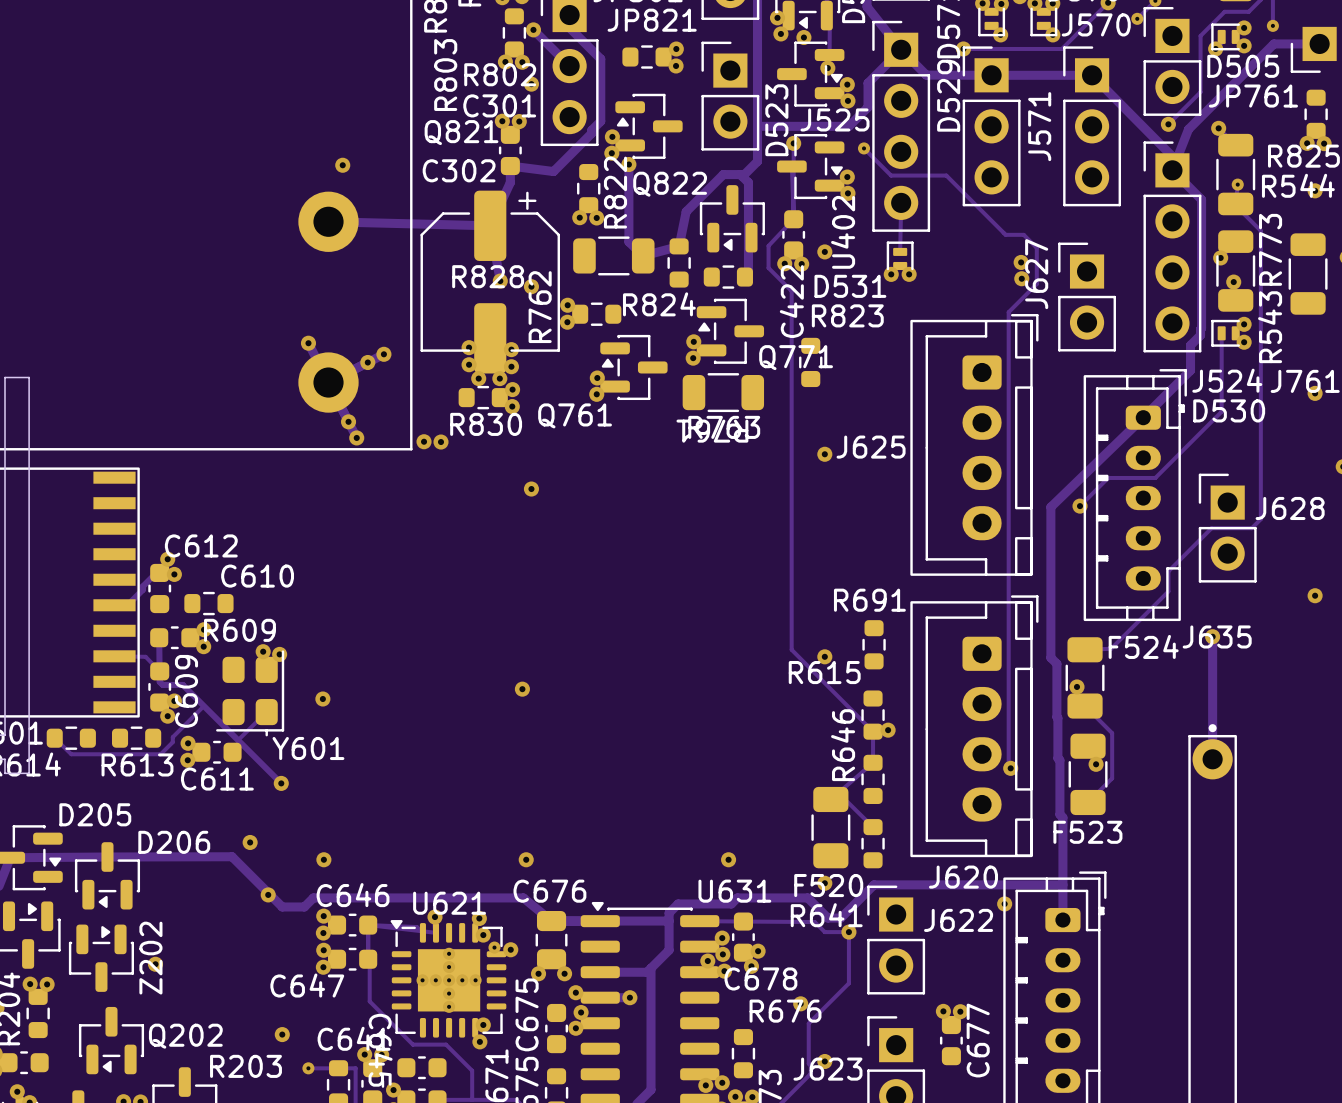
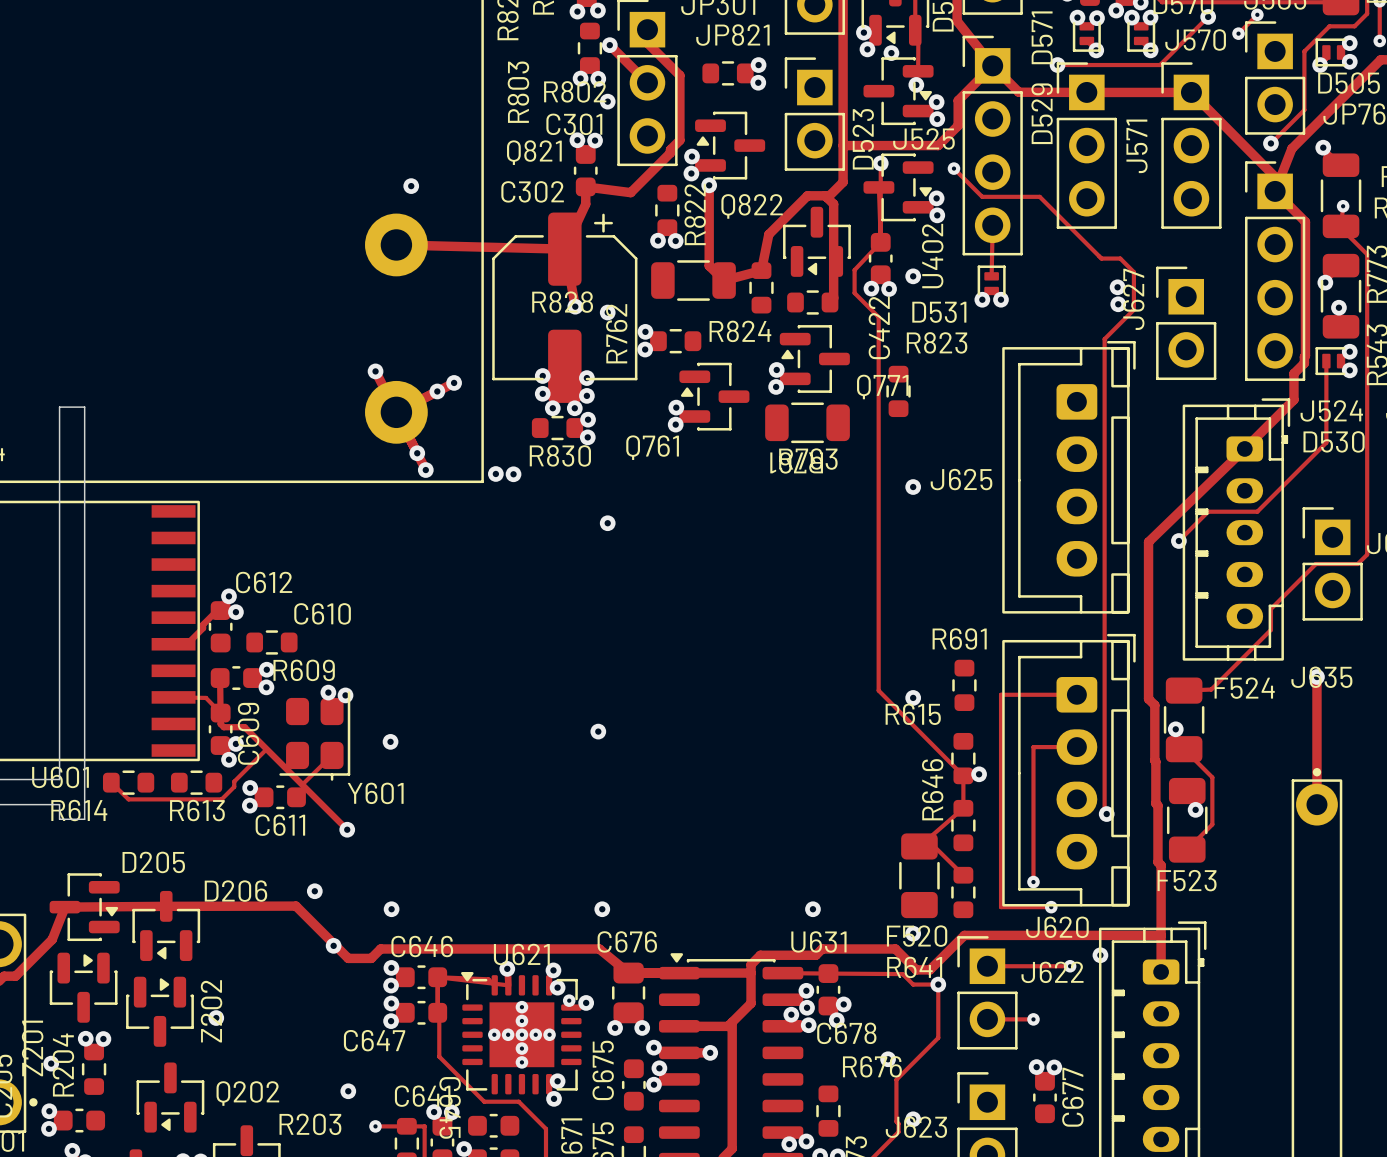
track: none -> (1076, 694) (1001, 694) (1001, 907) (1051, 907)
track: none -> (1076, 747) (1033, 747) (1033, 882)
via: none -> (1033, 882)
via: none -> (1051, 907)
track: none -> (987, 966) (1070, 966)
via: none -> (1070, 966)
track: none -> (987, 1019) (1033, 1019)
via: none -> (1033, 1019)

